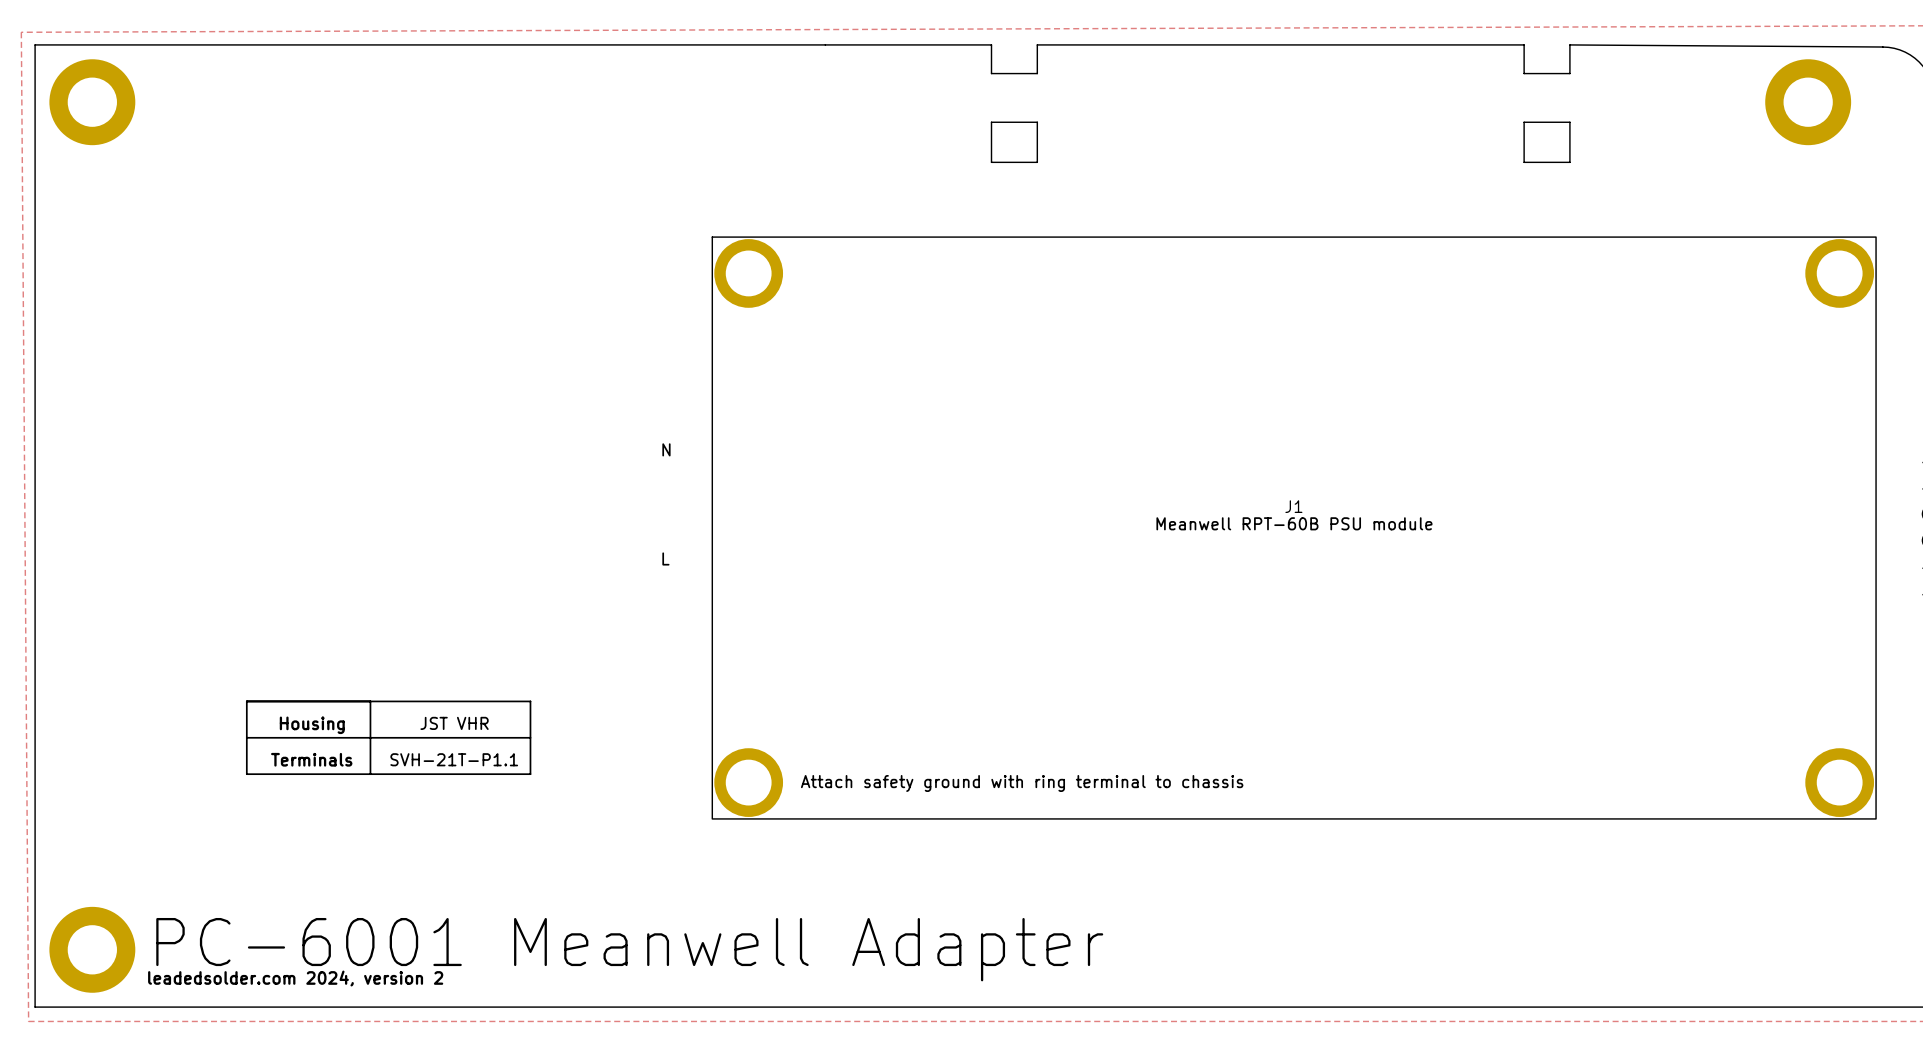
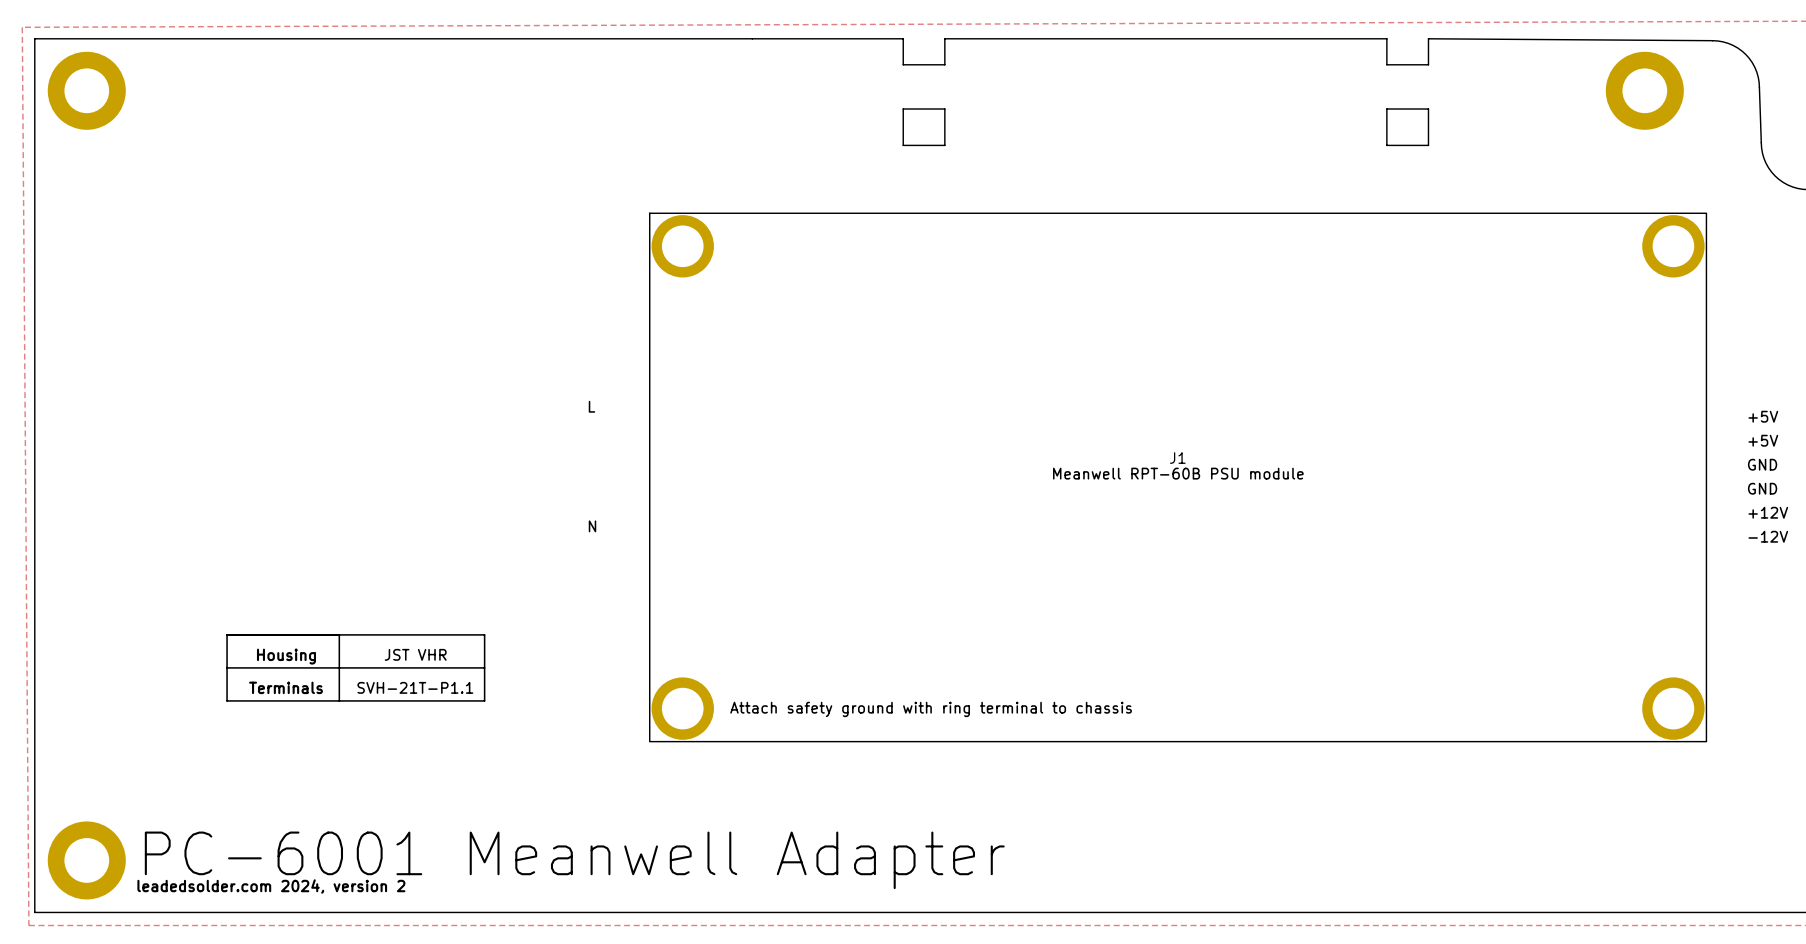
text position: N (666, 449) -> N (592, 526)
text position: L (665, 558) -> L (592, 406)

